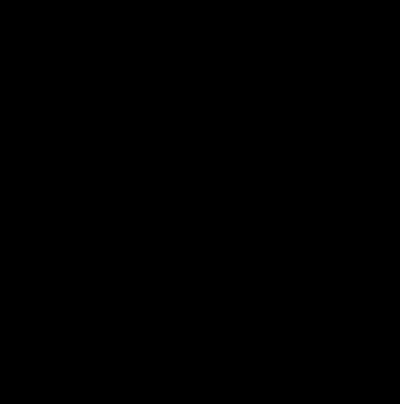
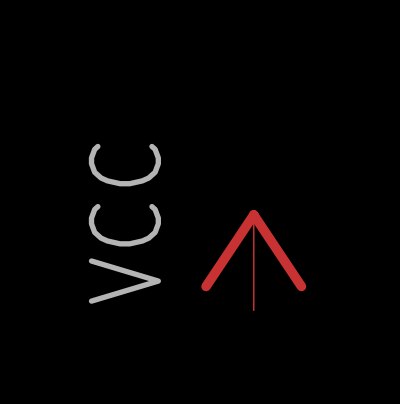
power symbol: none -> VCC (253, 260)

